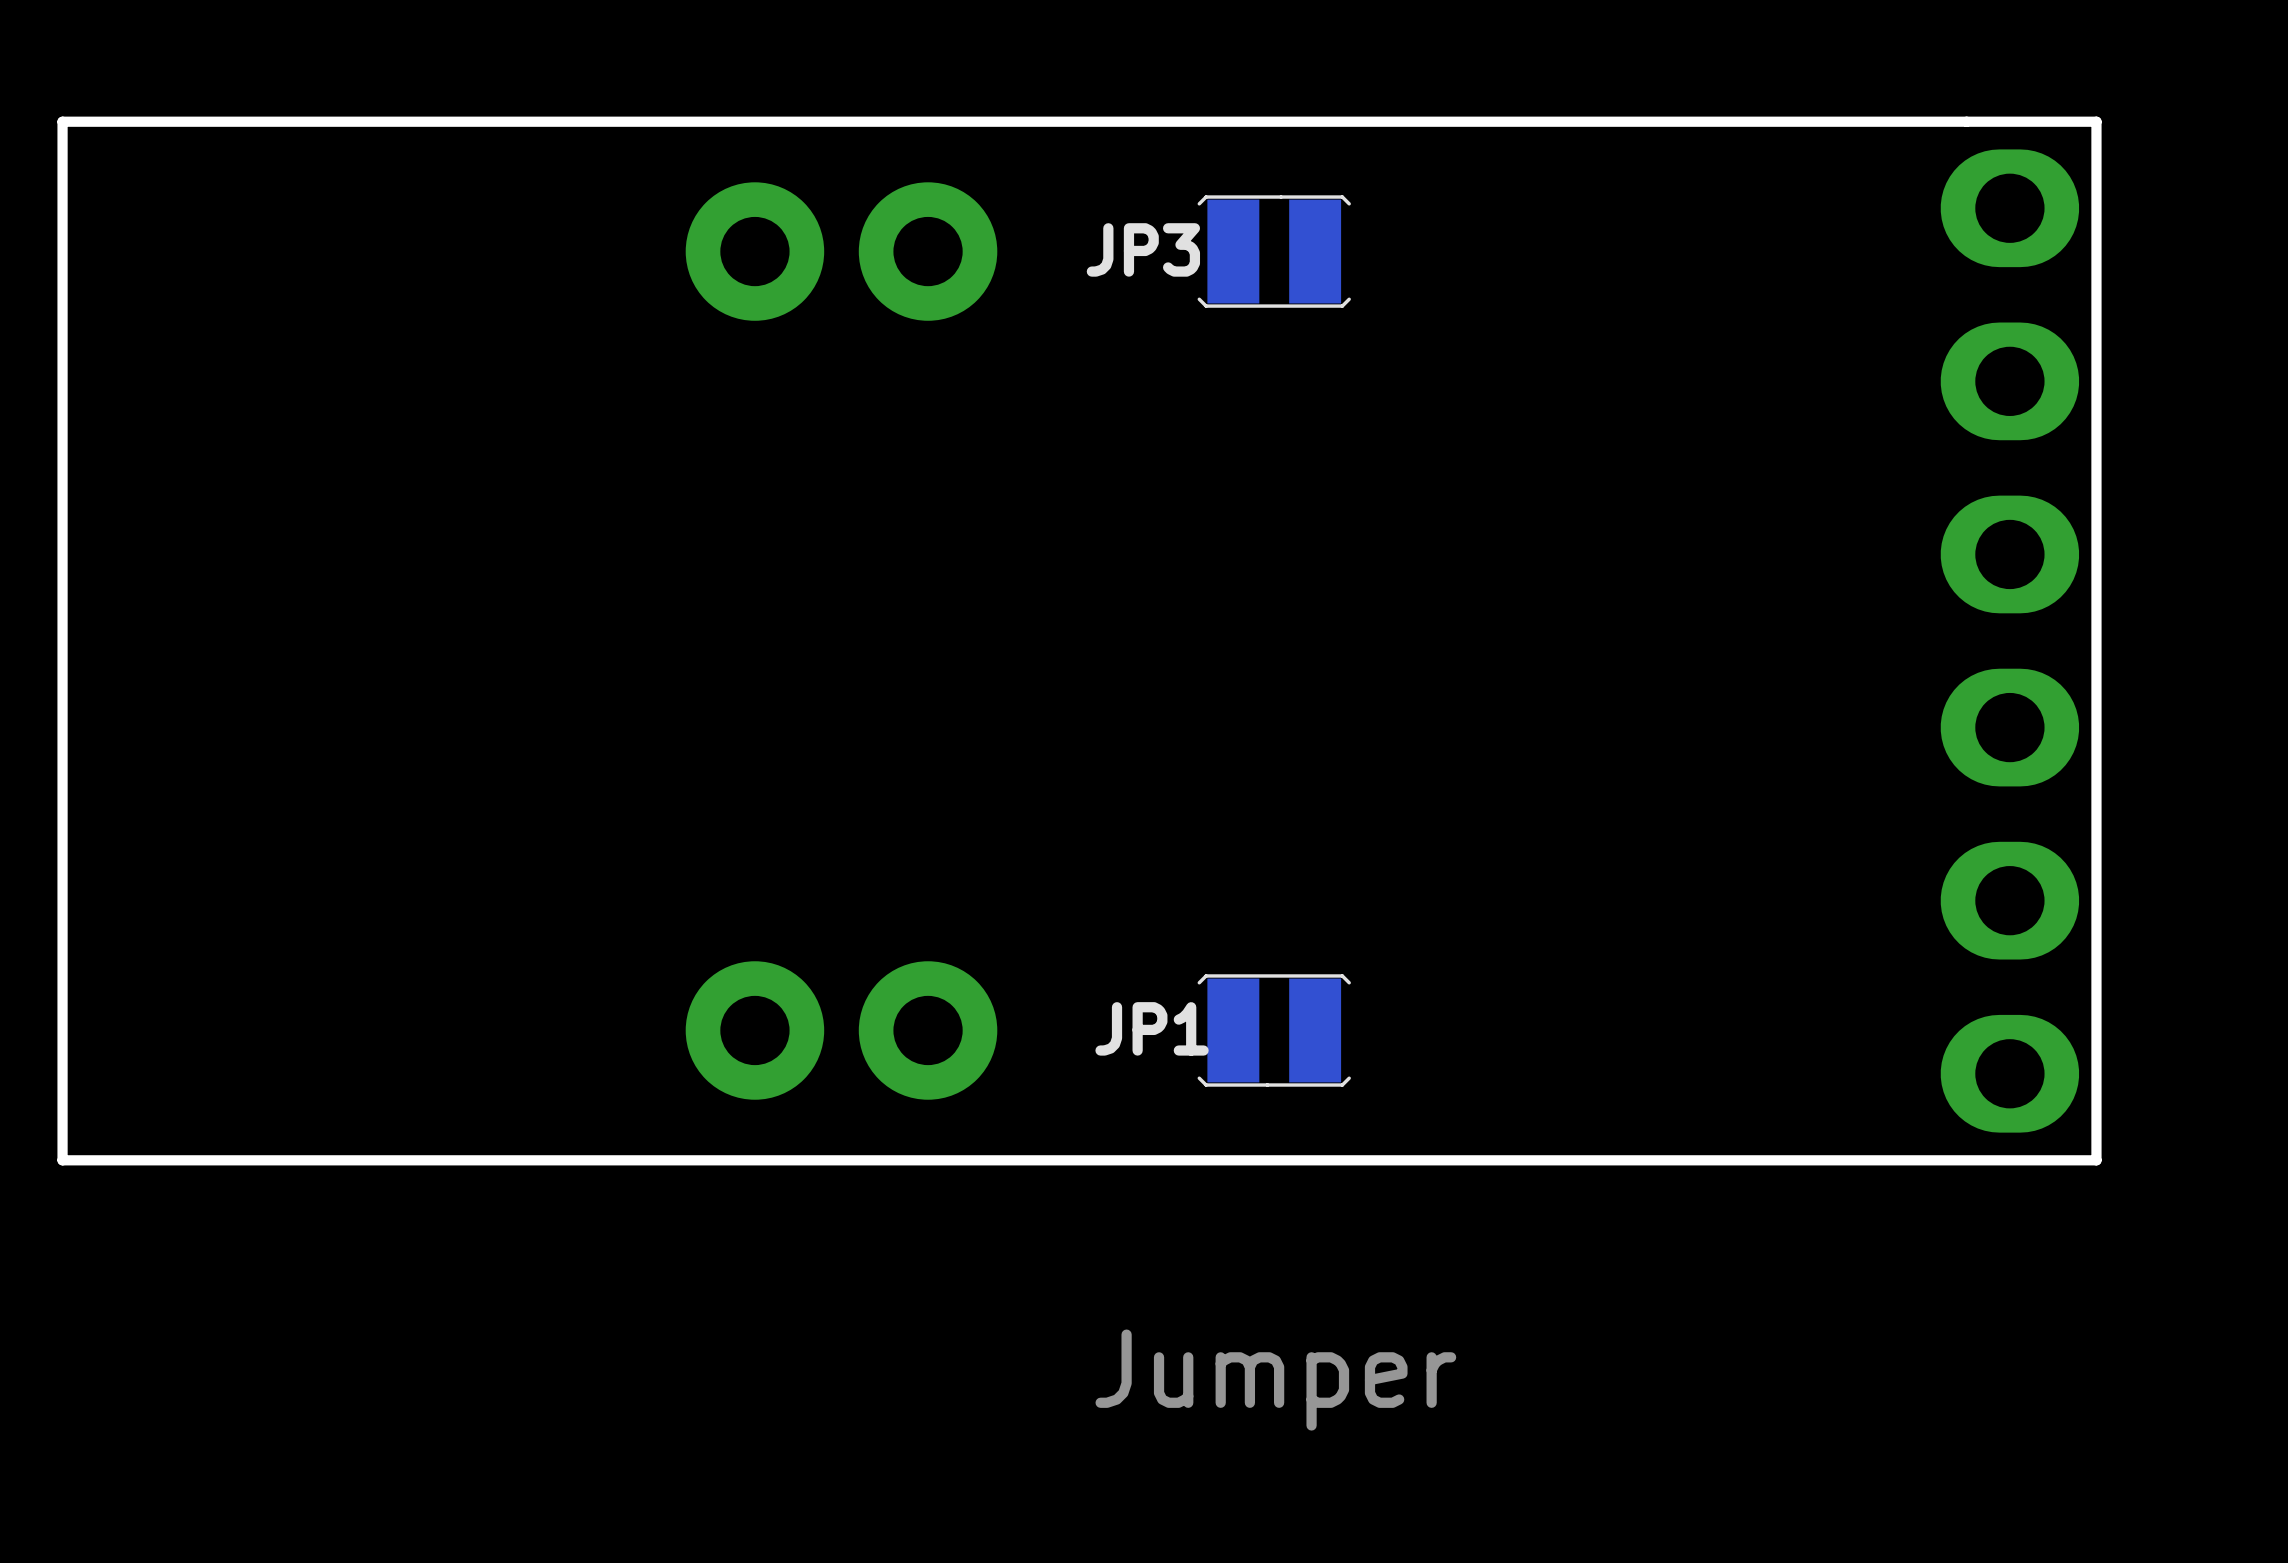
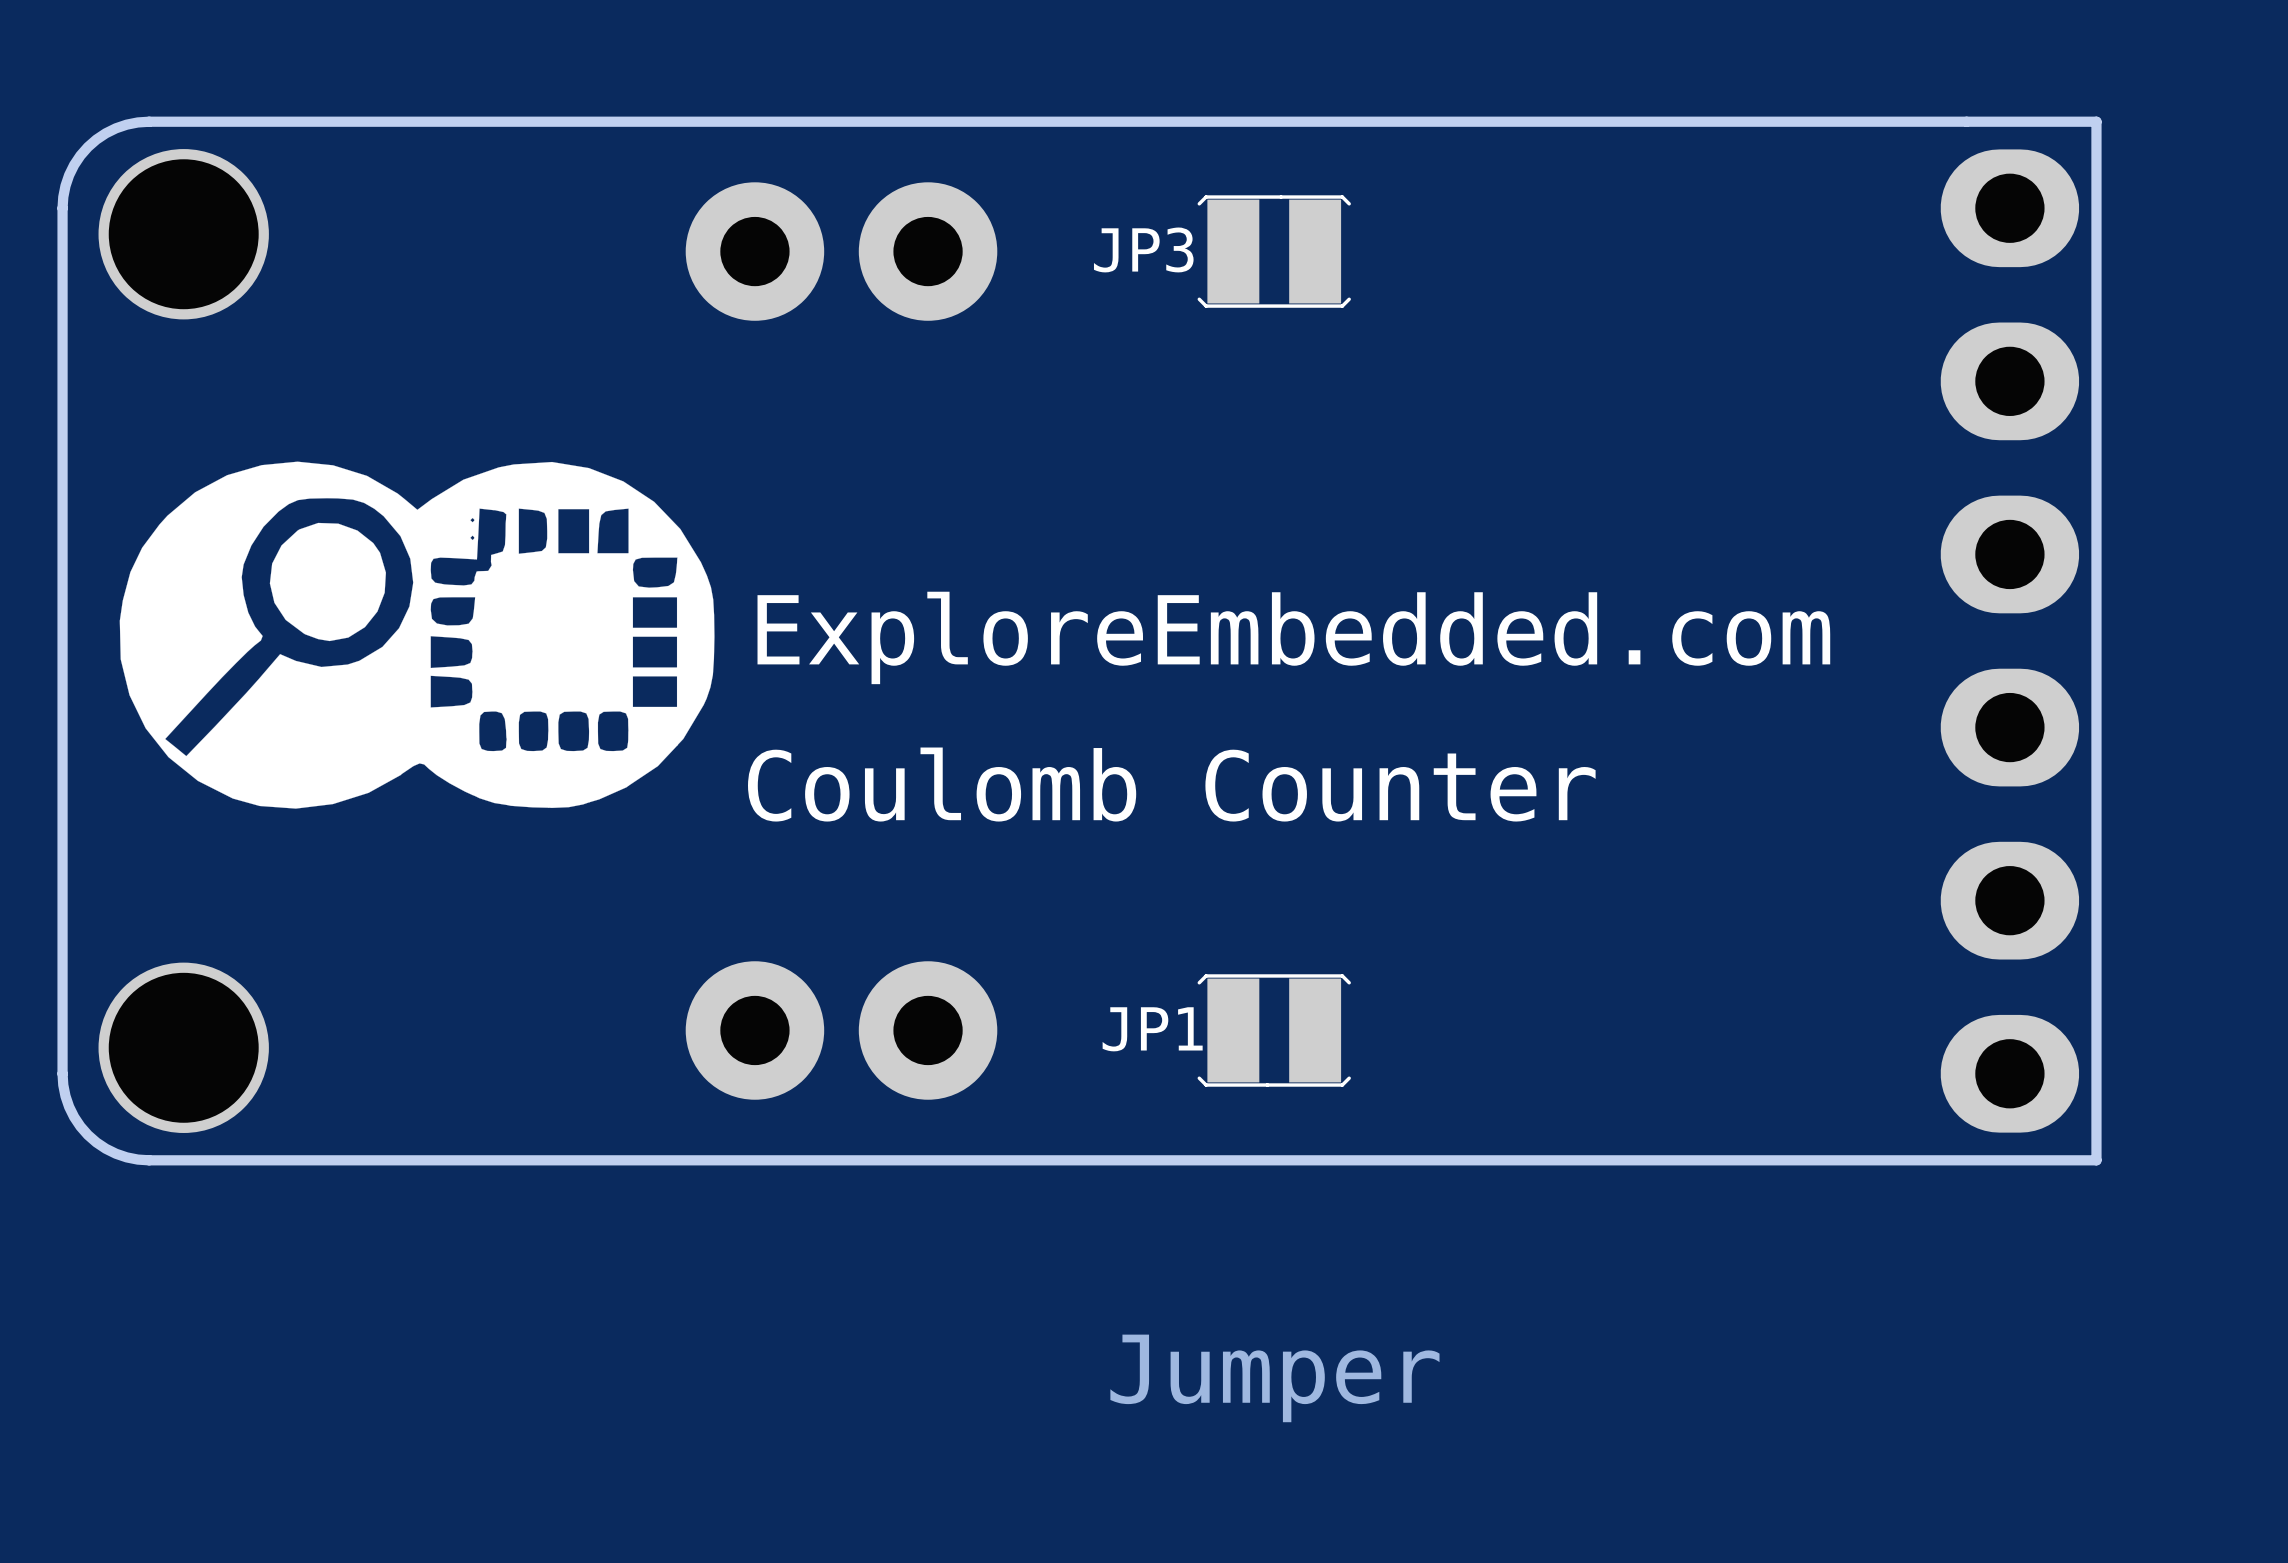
board edge: (149, 121) (62, 121) (62, 208) -> (149, 121) (115, 128) (87, 147) (69, 175) (62, 208)
part: none -> (183, 234)
drawing: none -> [119, 461, 715, 809]
text: none -> ExploreEmbedded.com (1293, 637)
text: none -> Coulomb Counter (1171, 784)
part: none -> (183, 1047)
board edge: (62, 1073) (62, 1160) (149, 1160) -> (62, 1073) (69, 1106) (87, 1134) (115, 1153) (149, 1160)

